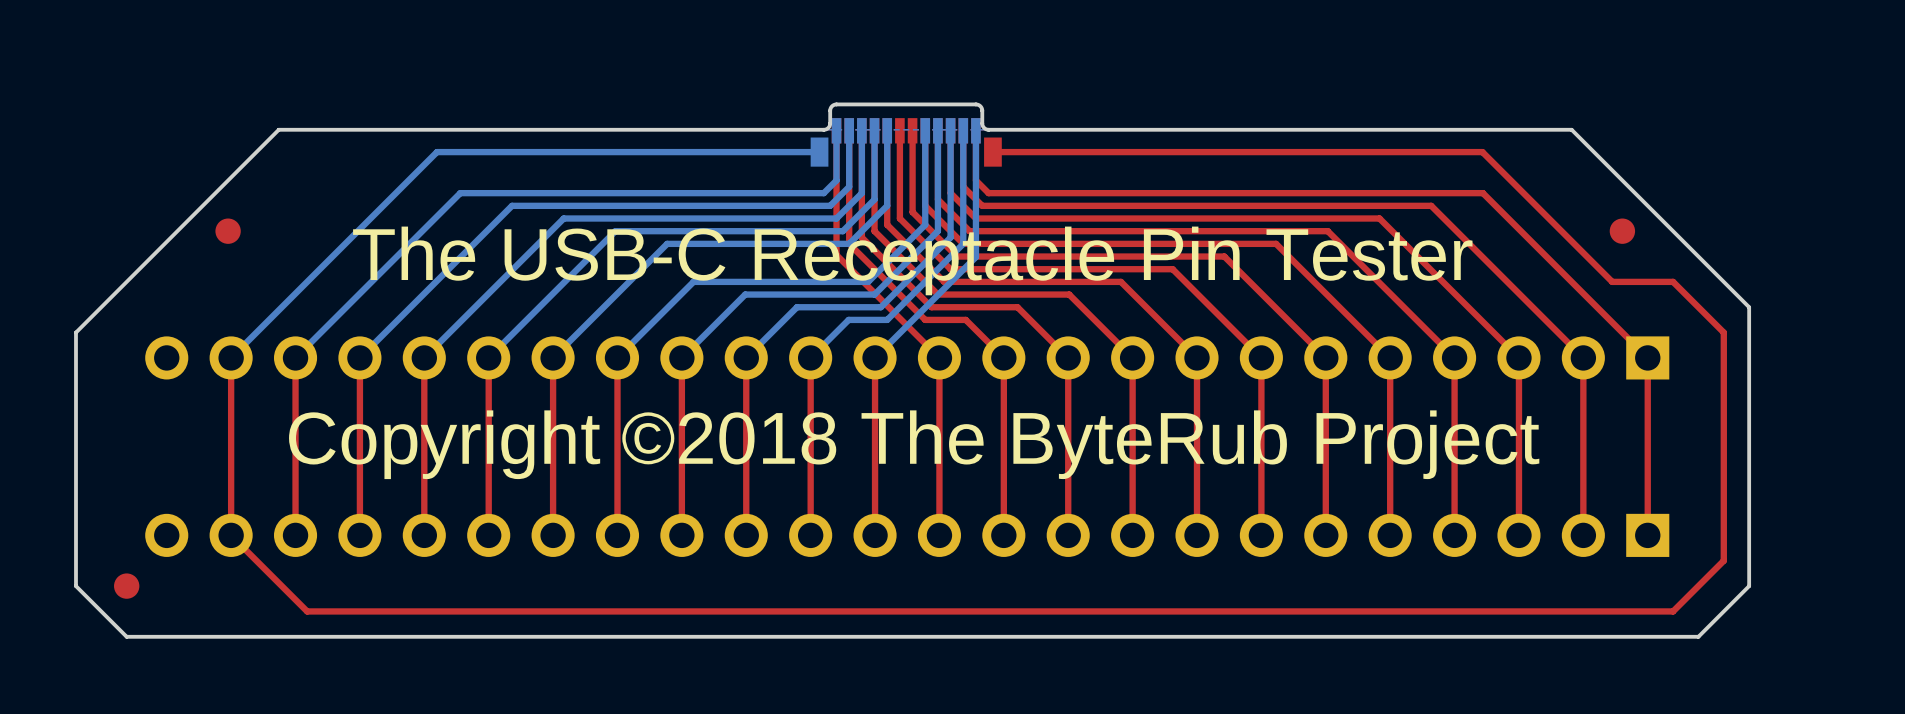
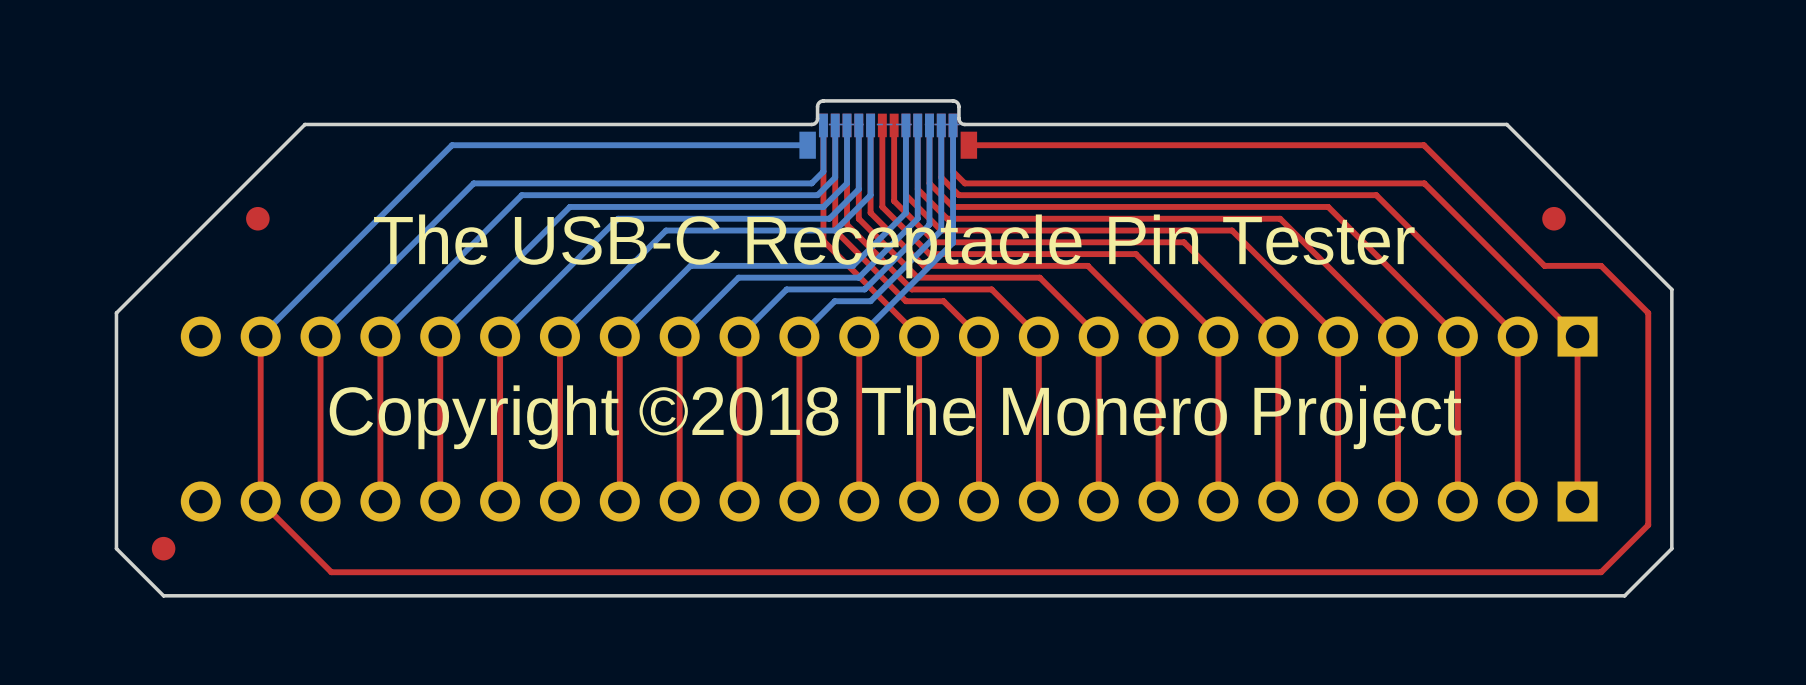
text: Copyright ©2018 The ByteRub Project (914, 444) -> Copyright ©2018 The Monero Project (895, 417)

